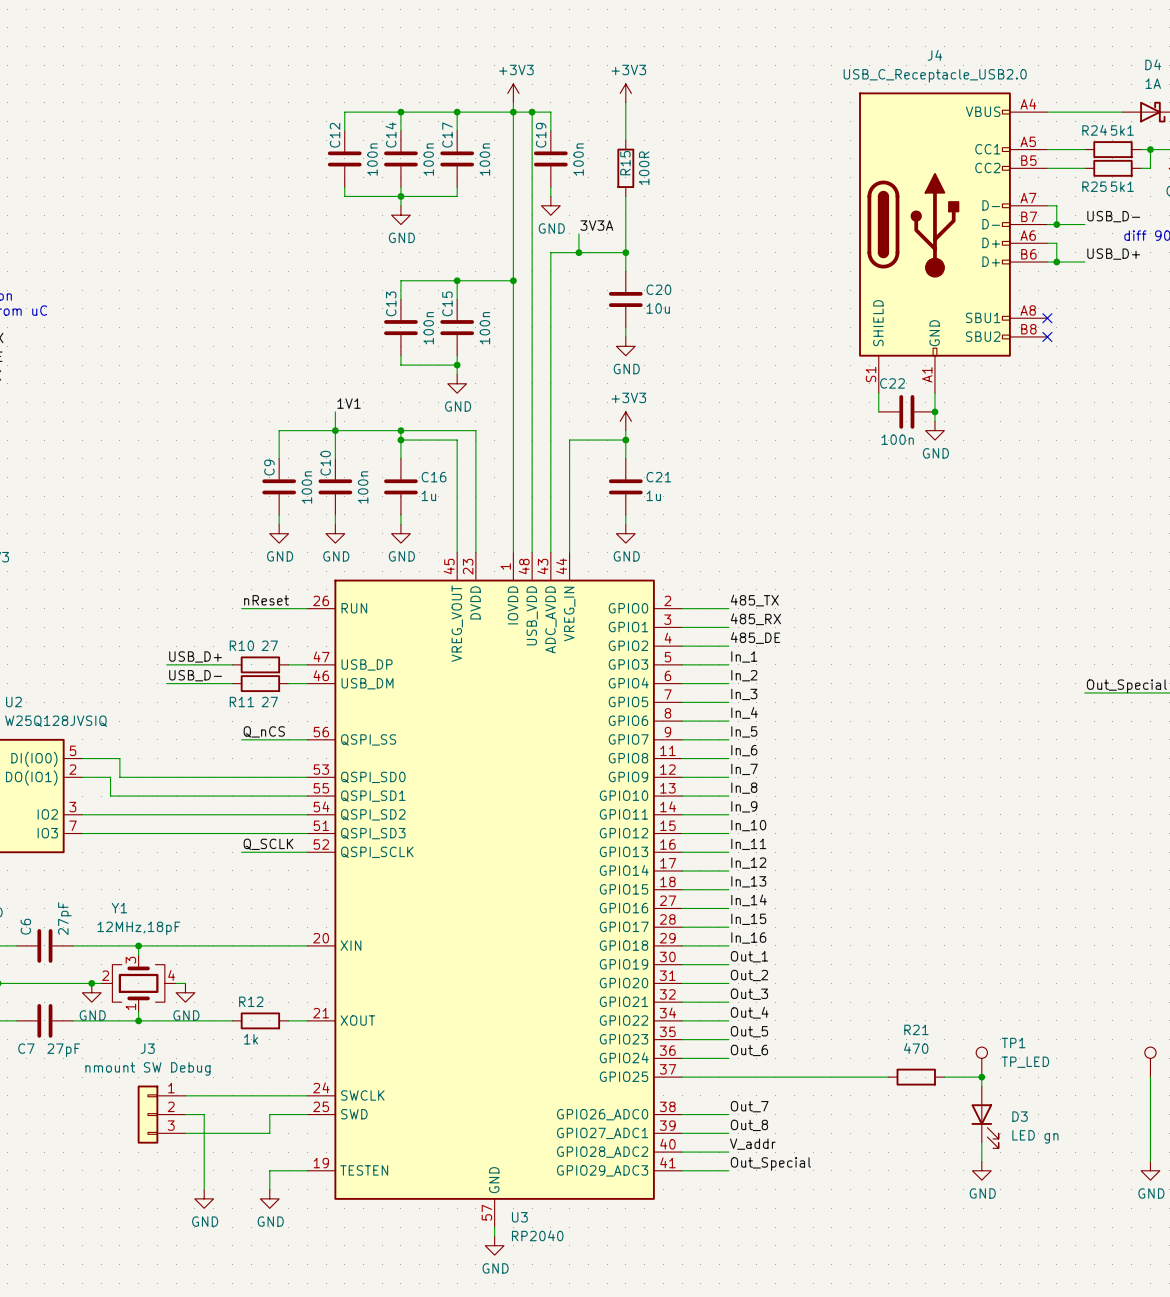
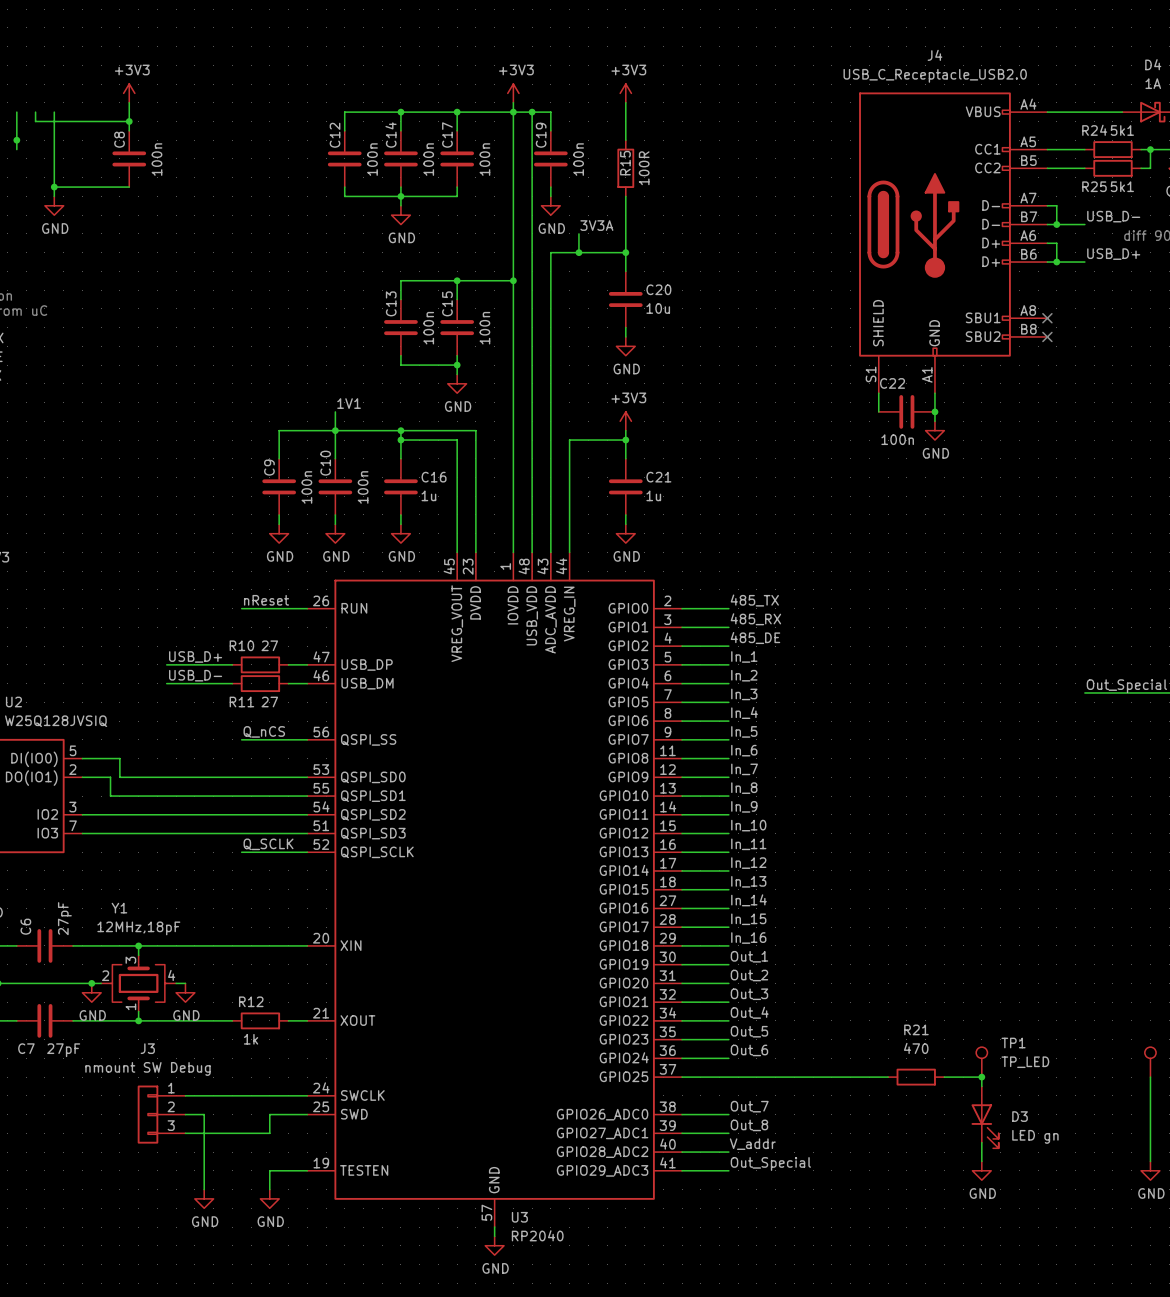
power symbol: none -> +3V3 (129, 93)
wire: none -> (129, 102) (129, 130)
wire: none -> (16, 112) (16, 149)
wire: none -> (35, 112) (35, 121) (129, 121)
wire: none -> (54, 112) (54, 196)
junction: none -> (129, 121)
junction: none -> (16, 140)
C8: none -> 100n (129, 158)
wire: none -> (54, 187) (129, 187)
junction: none -> (54, 187)
power symbol: none -> GND (54, 205)

